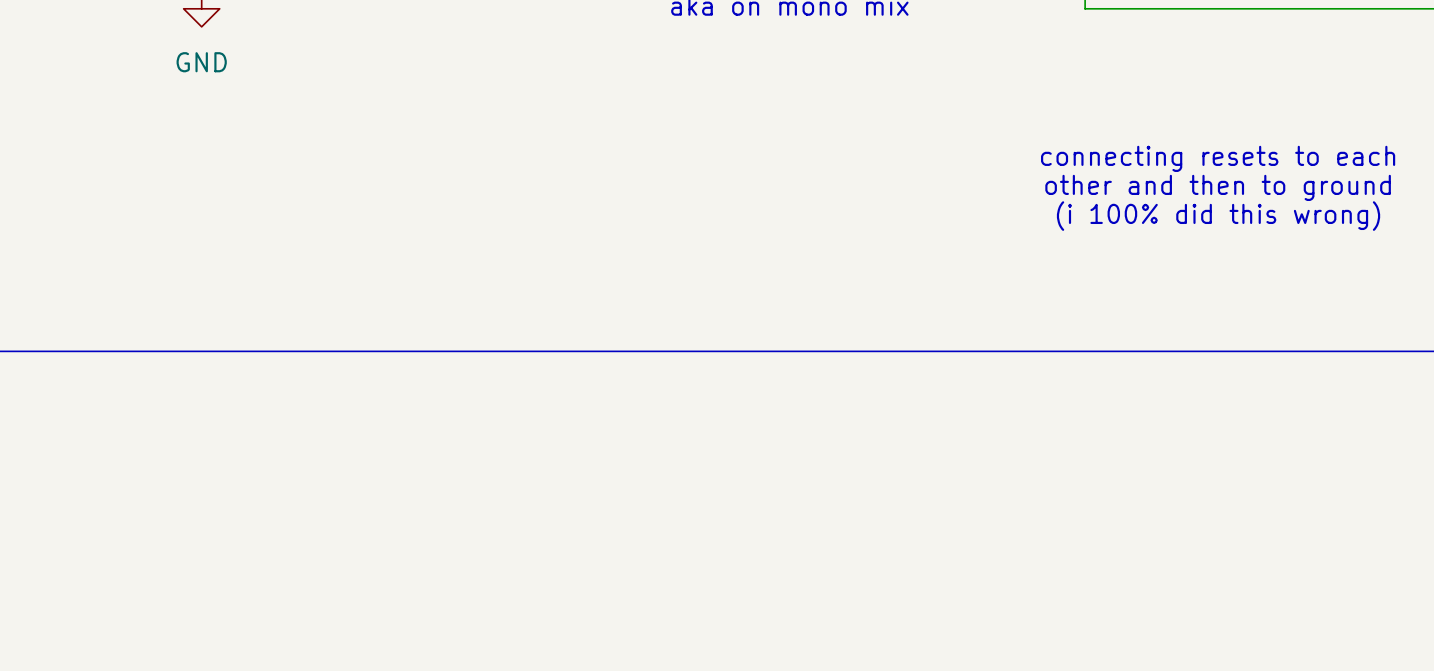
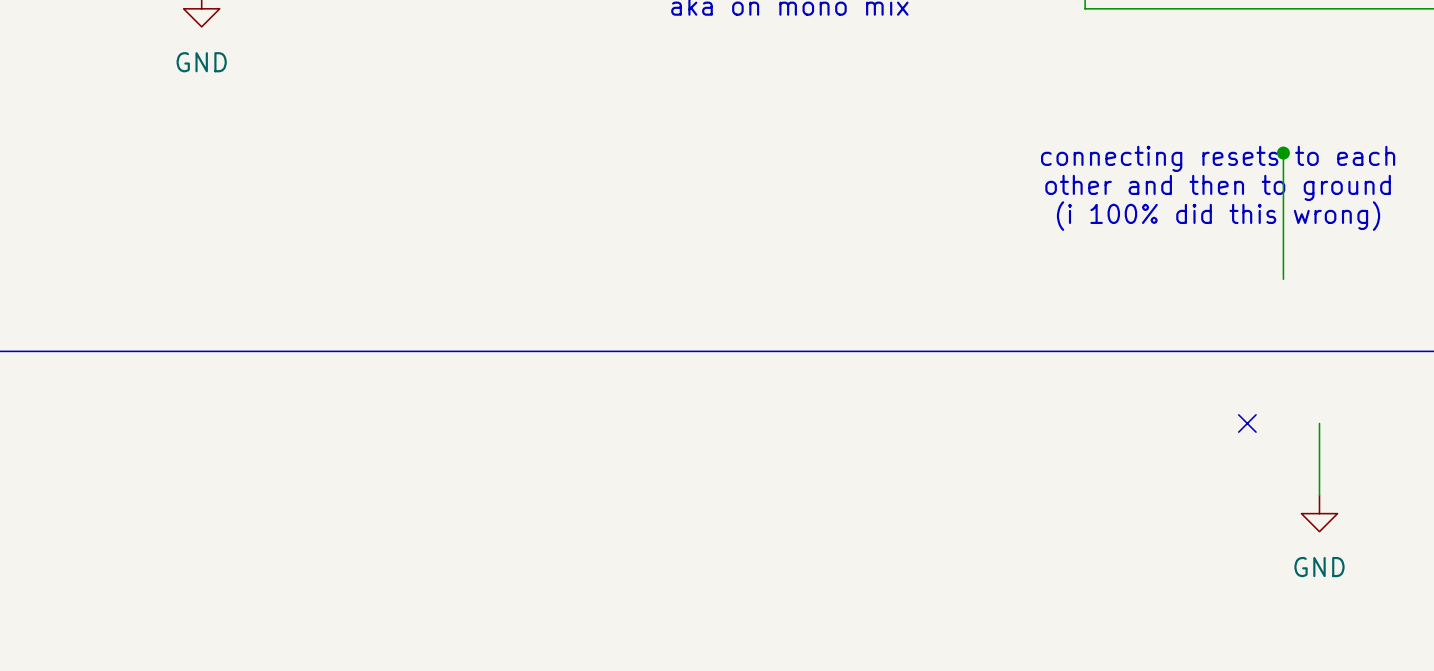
wire: none -> (1283, 153) (1283, 279)
junction: none -> (1283, 153)
no-connect mark: none -> (1247, 423)
wire: none -> (1319, 423) (1319, 495)
power symbol: none -> GND (1319, 513)

